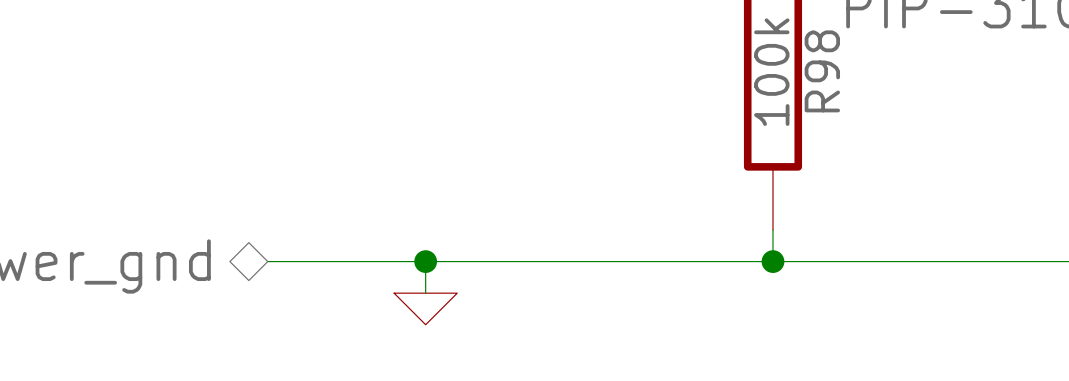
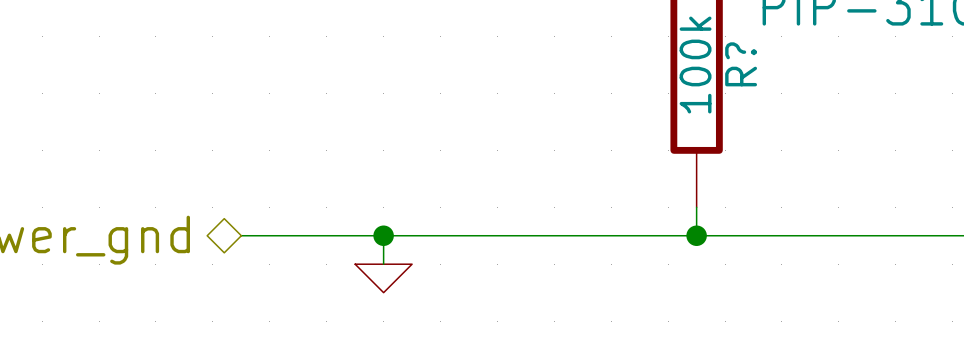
R98 name: R98 (822, 71) -> R? (741, 64)

